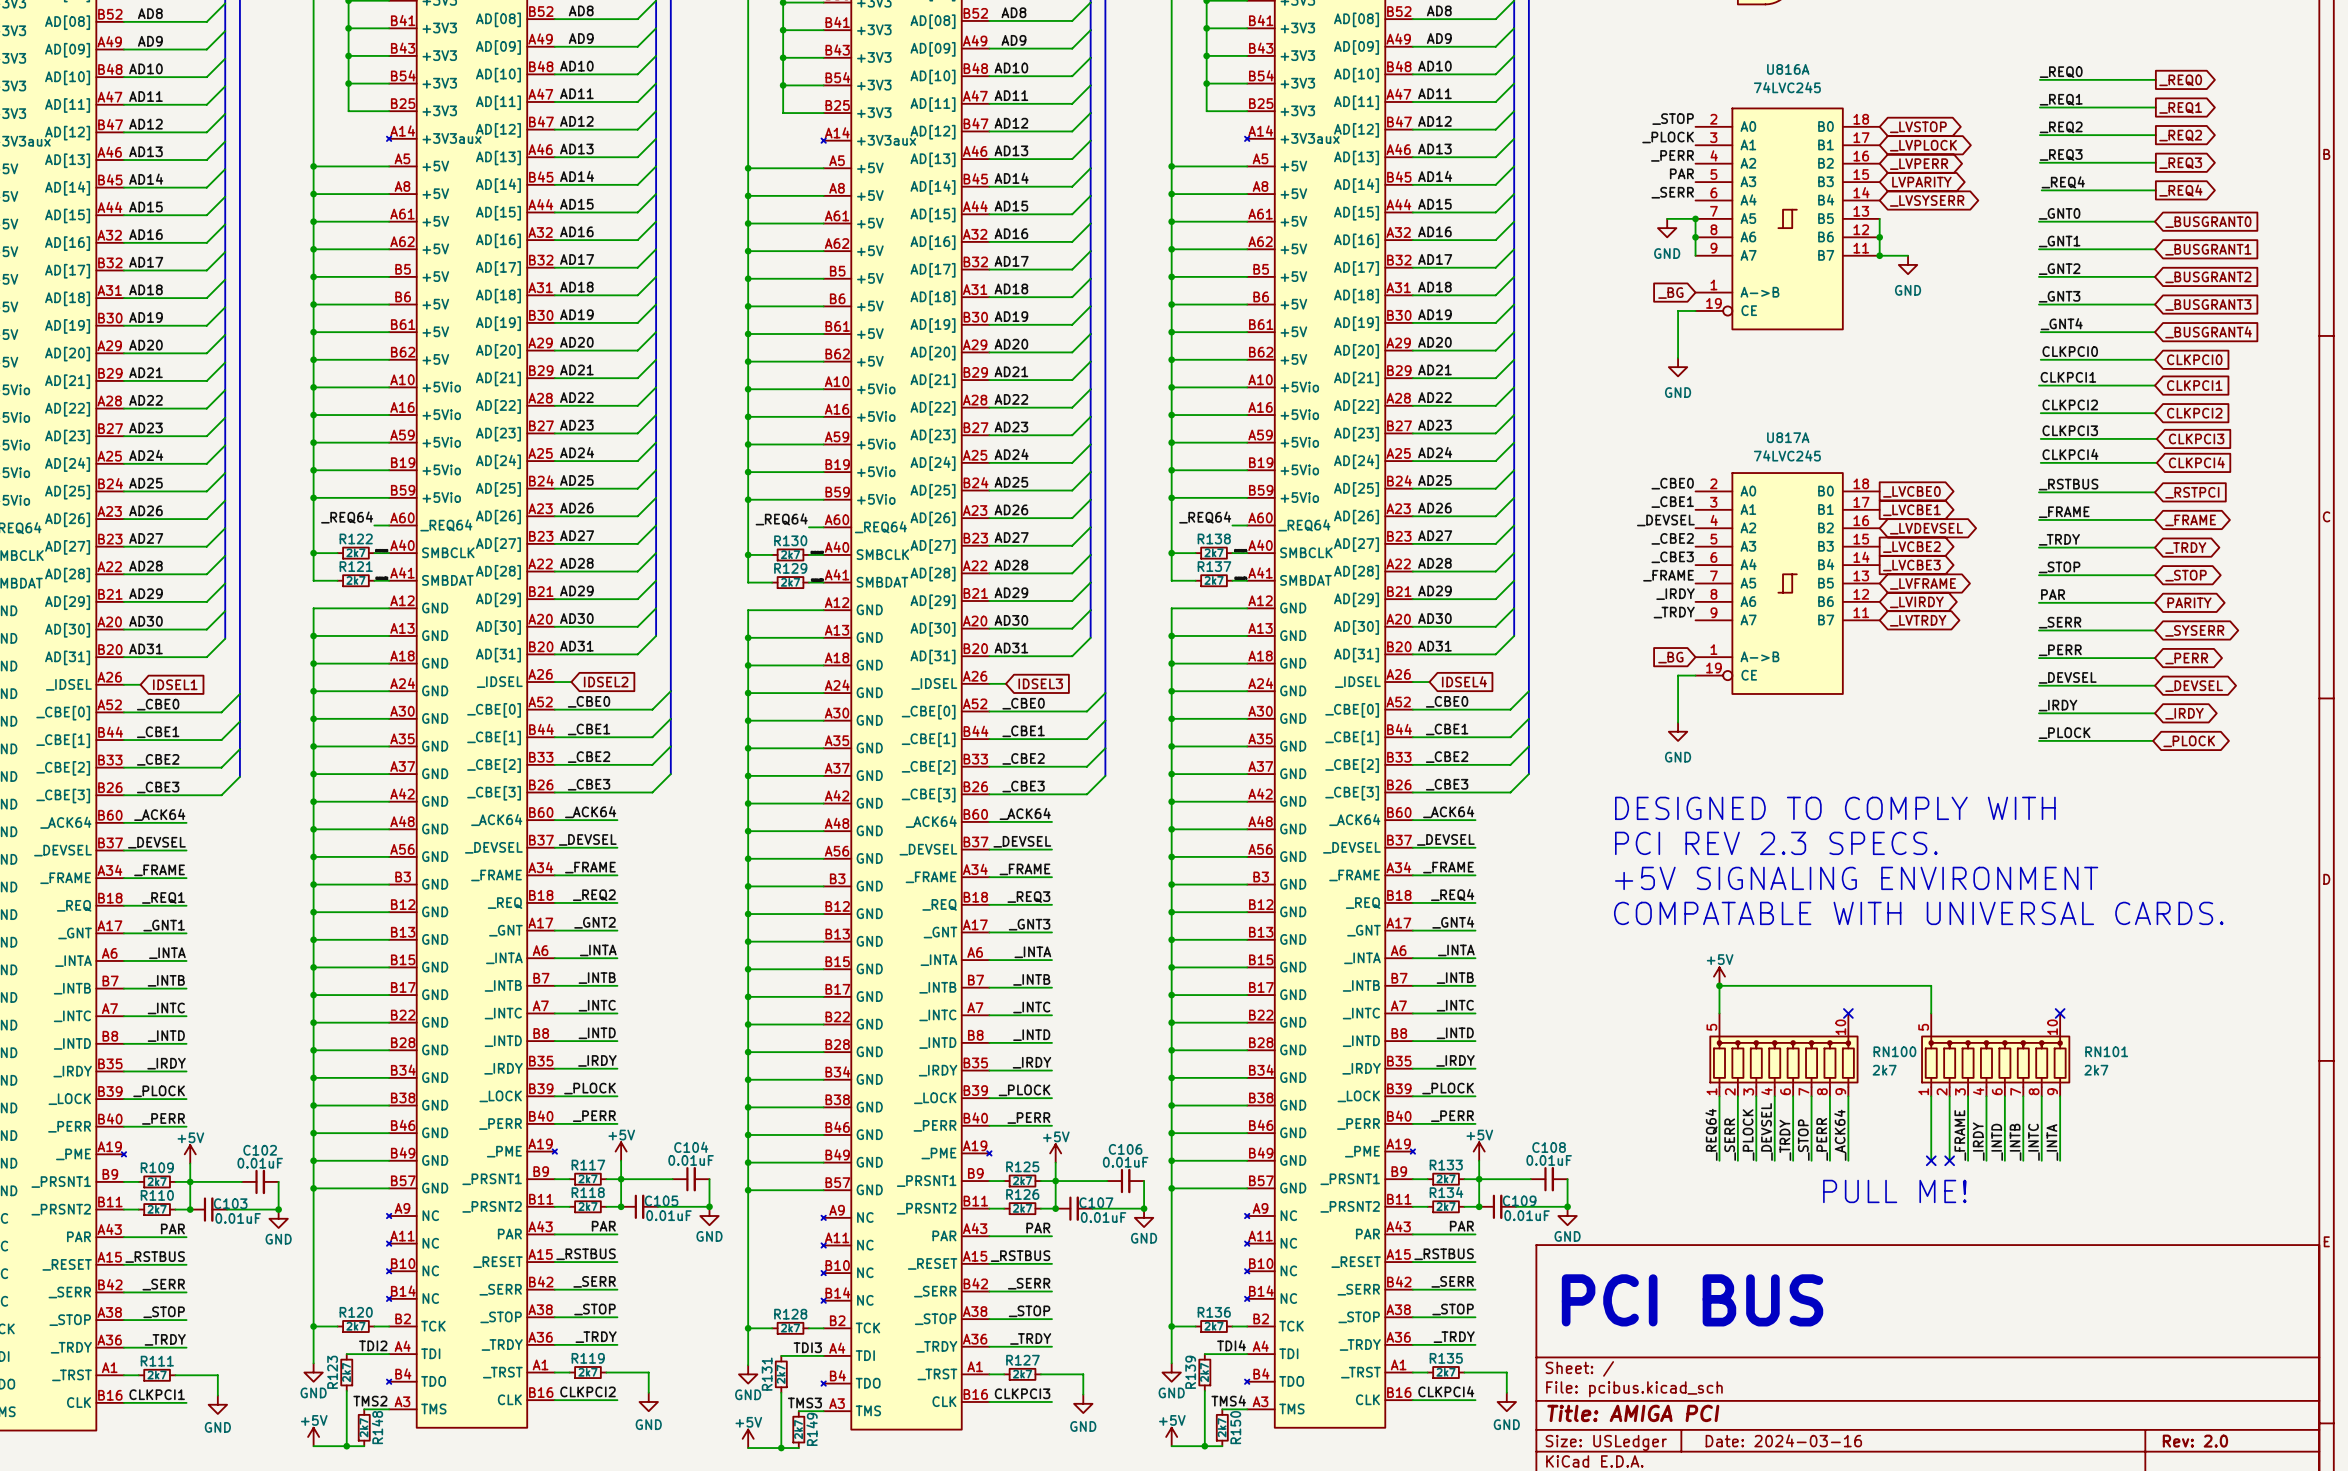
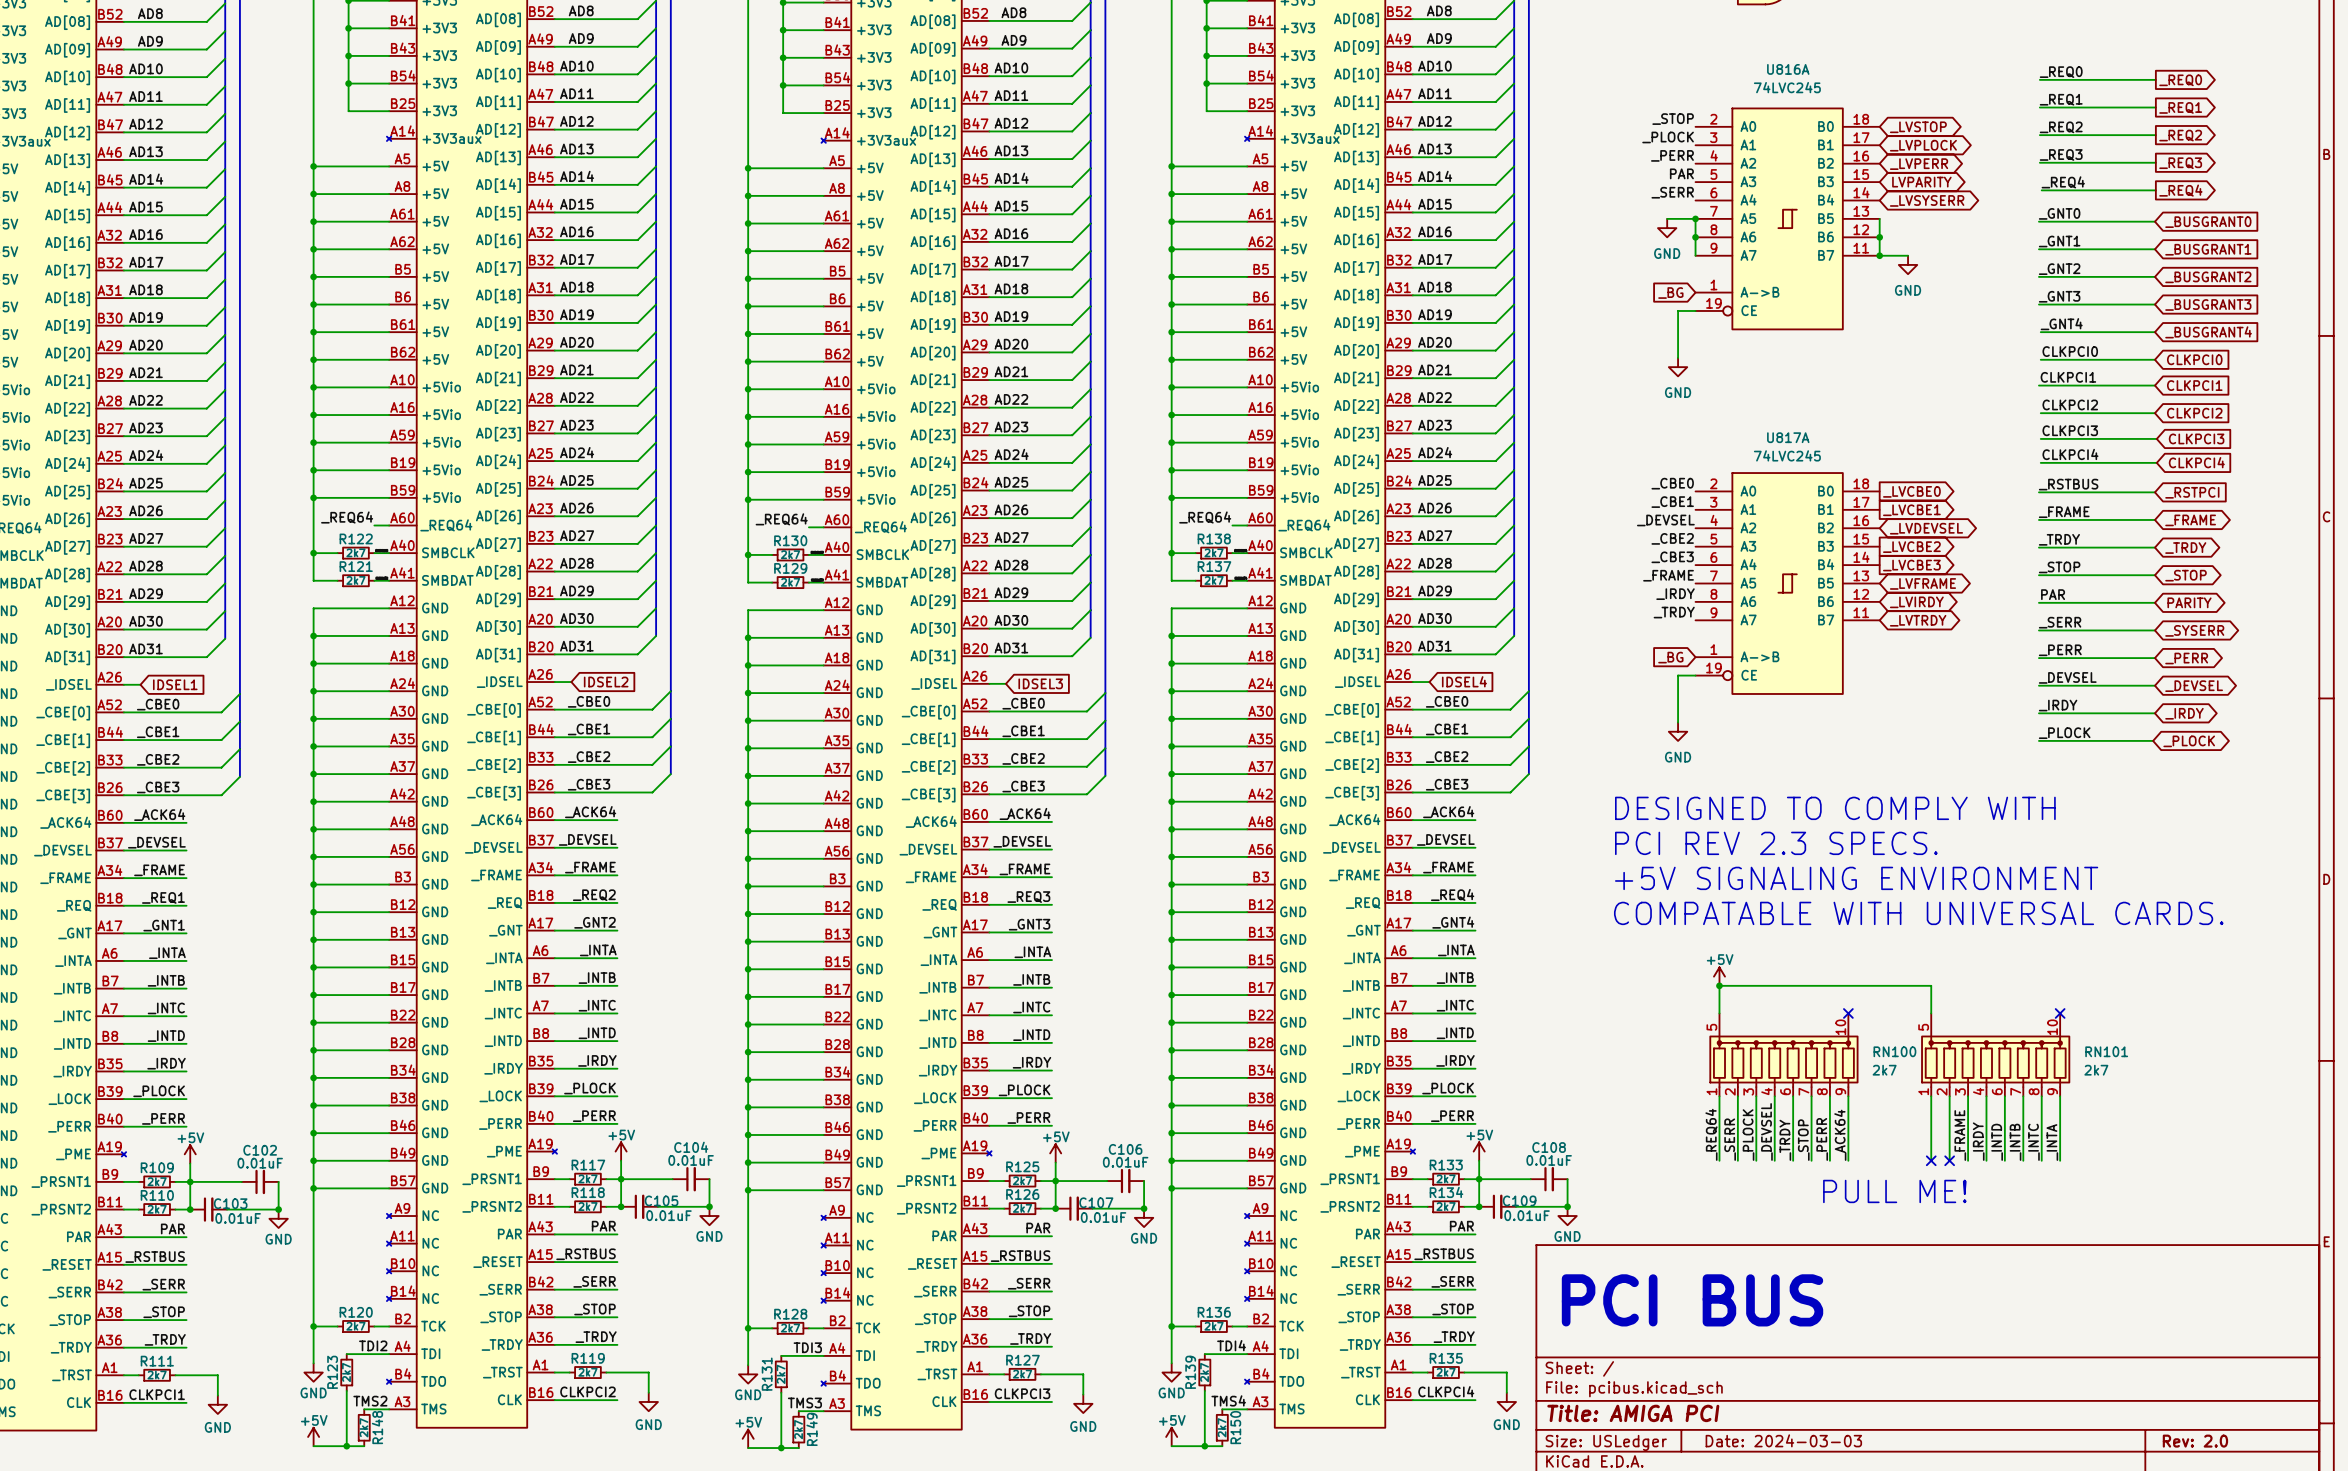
title block: Date: 2024-03-16 (1783, 1440) -> Date: 2024-03-03 (1783, 1440)

